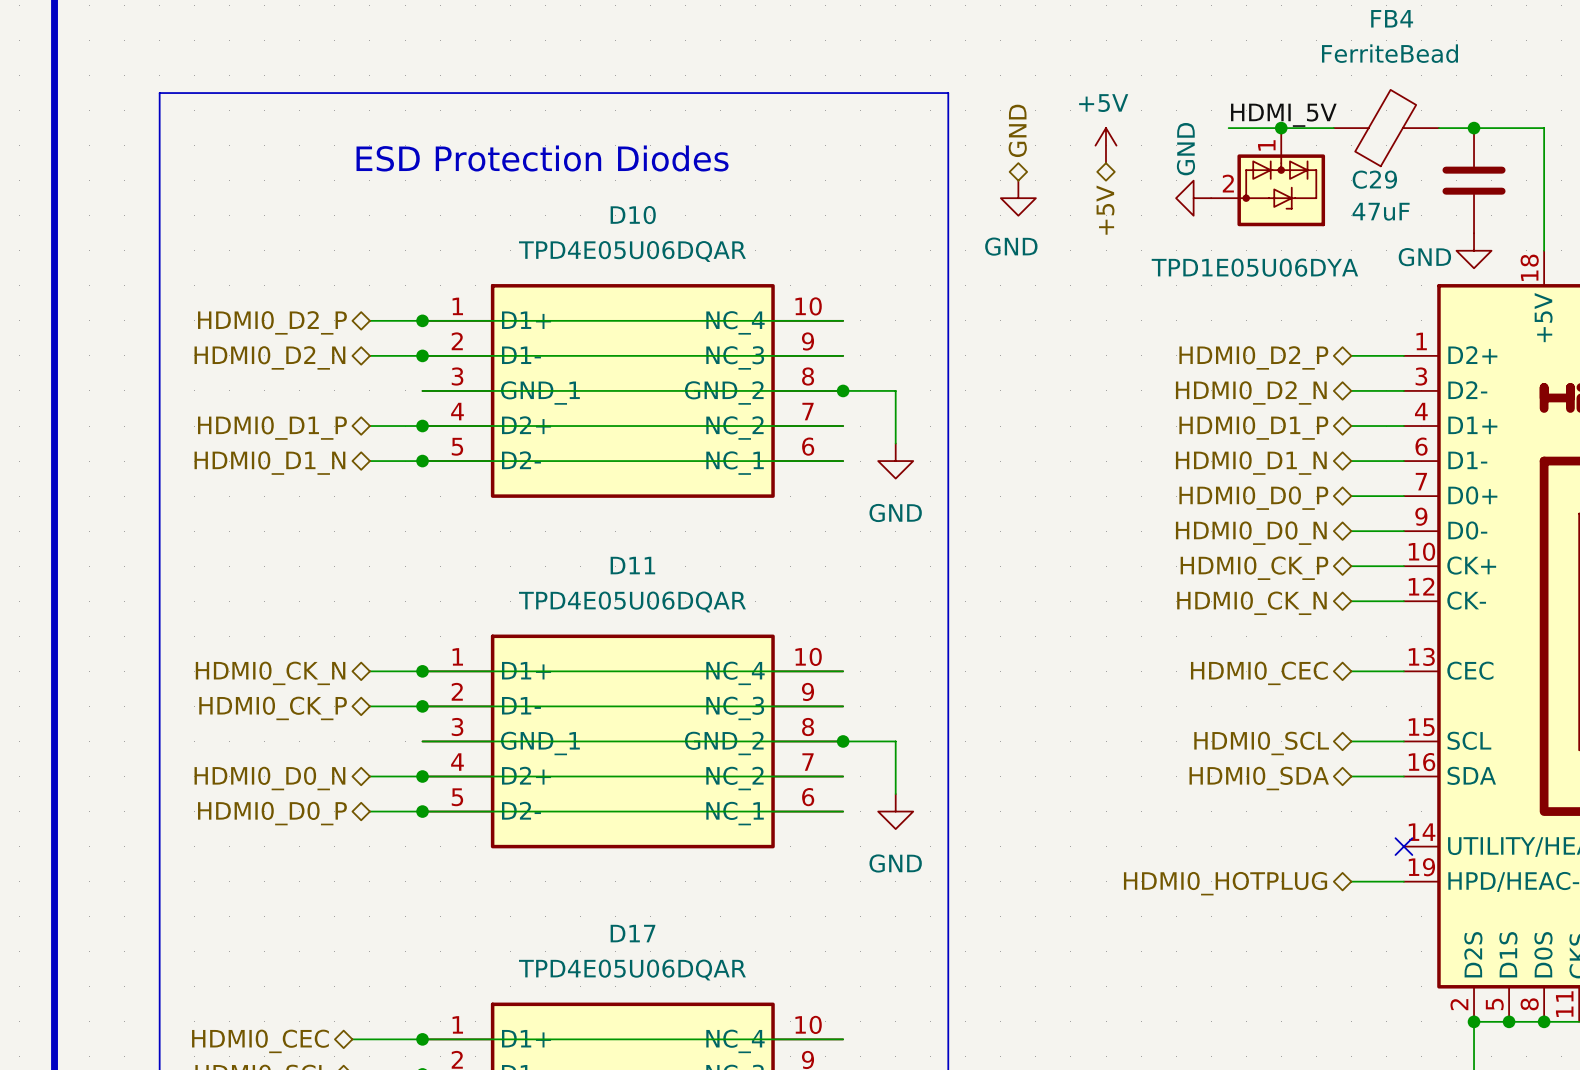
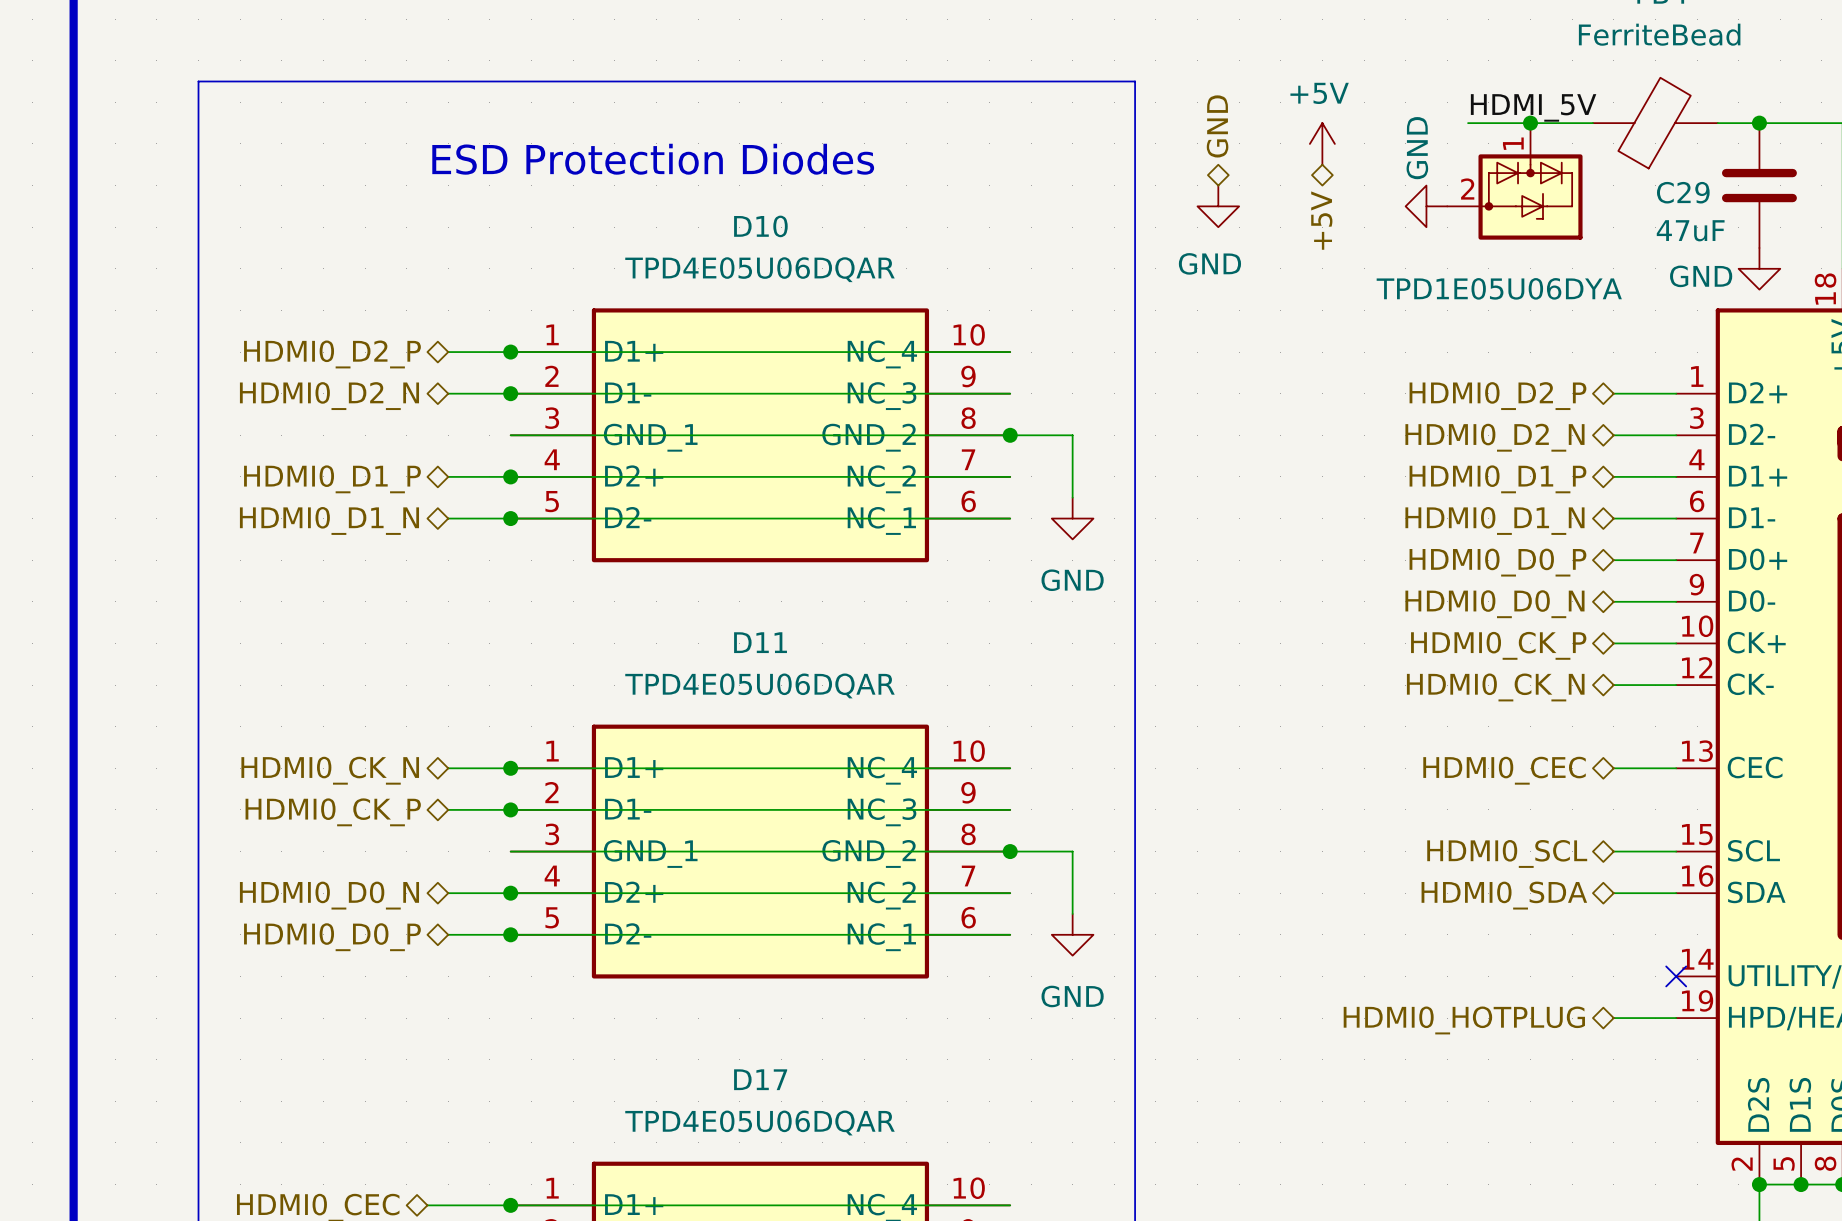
C29 name position: C29 (1374, 179) -> C29 (1683, 192)
C29 value position: 47uF (1381, 211) -> 47uF (1690, 230)

